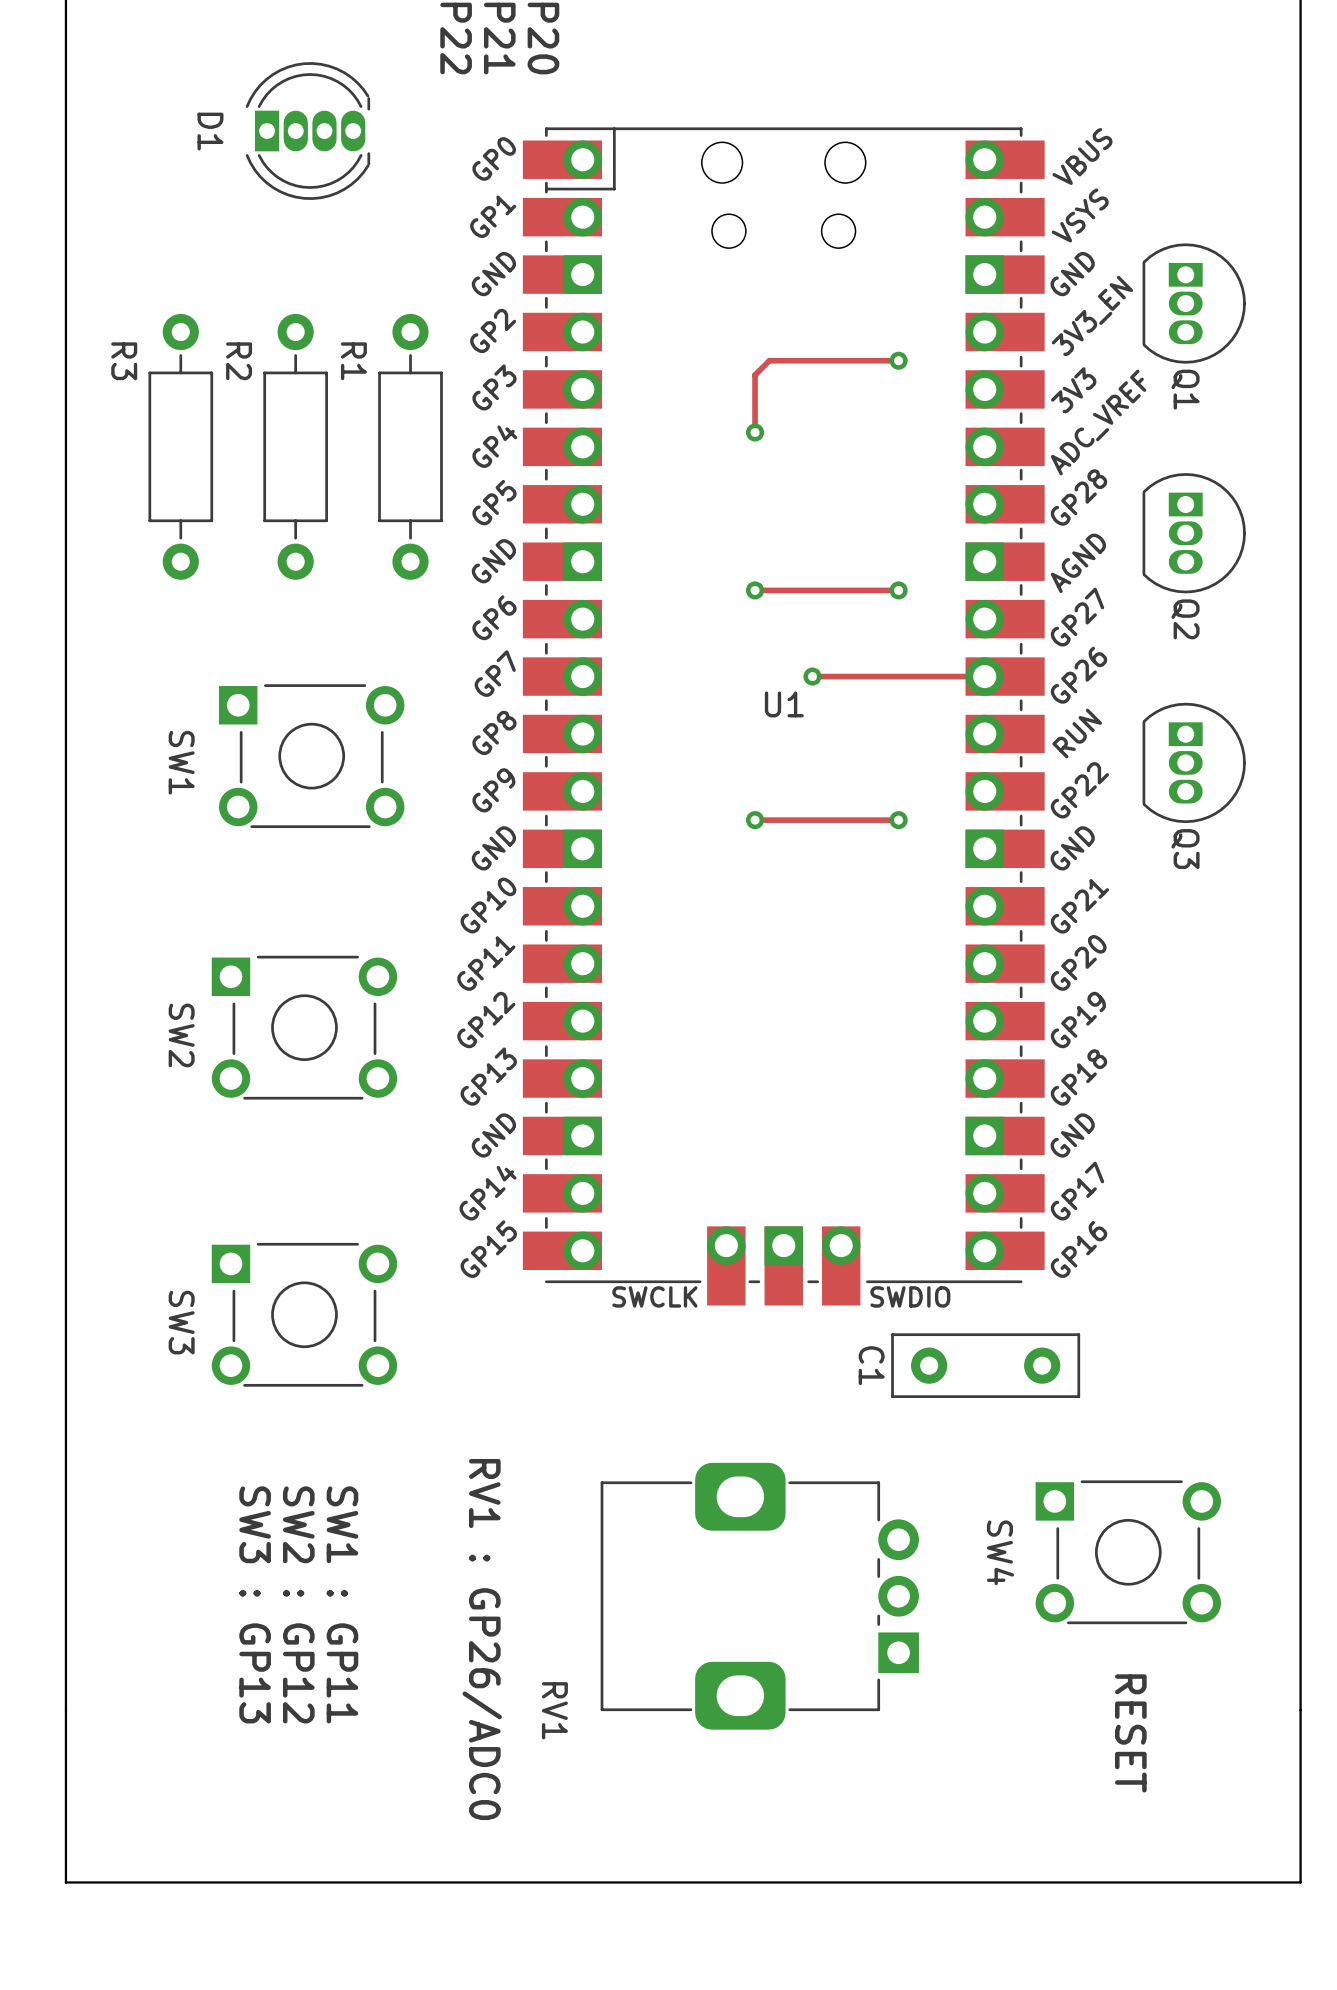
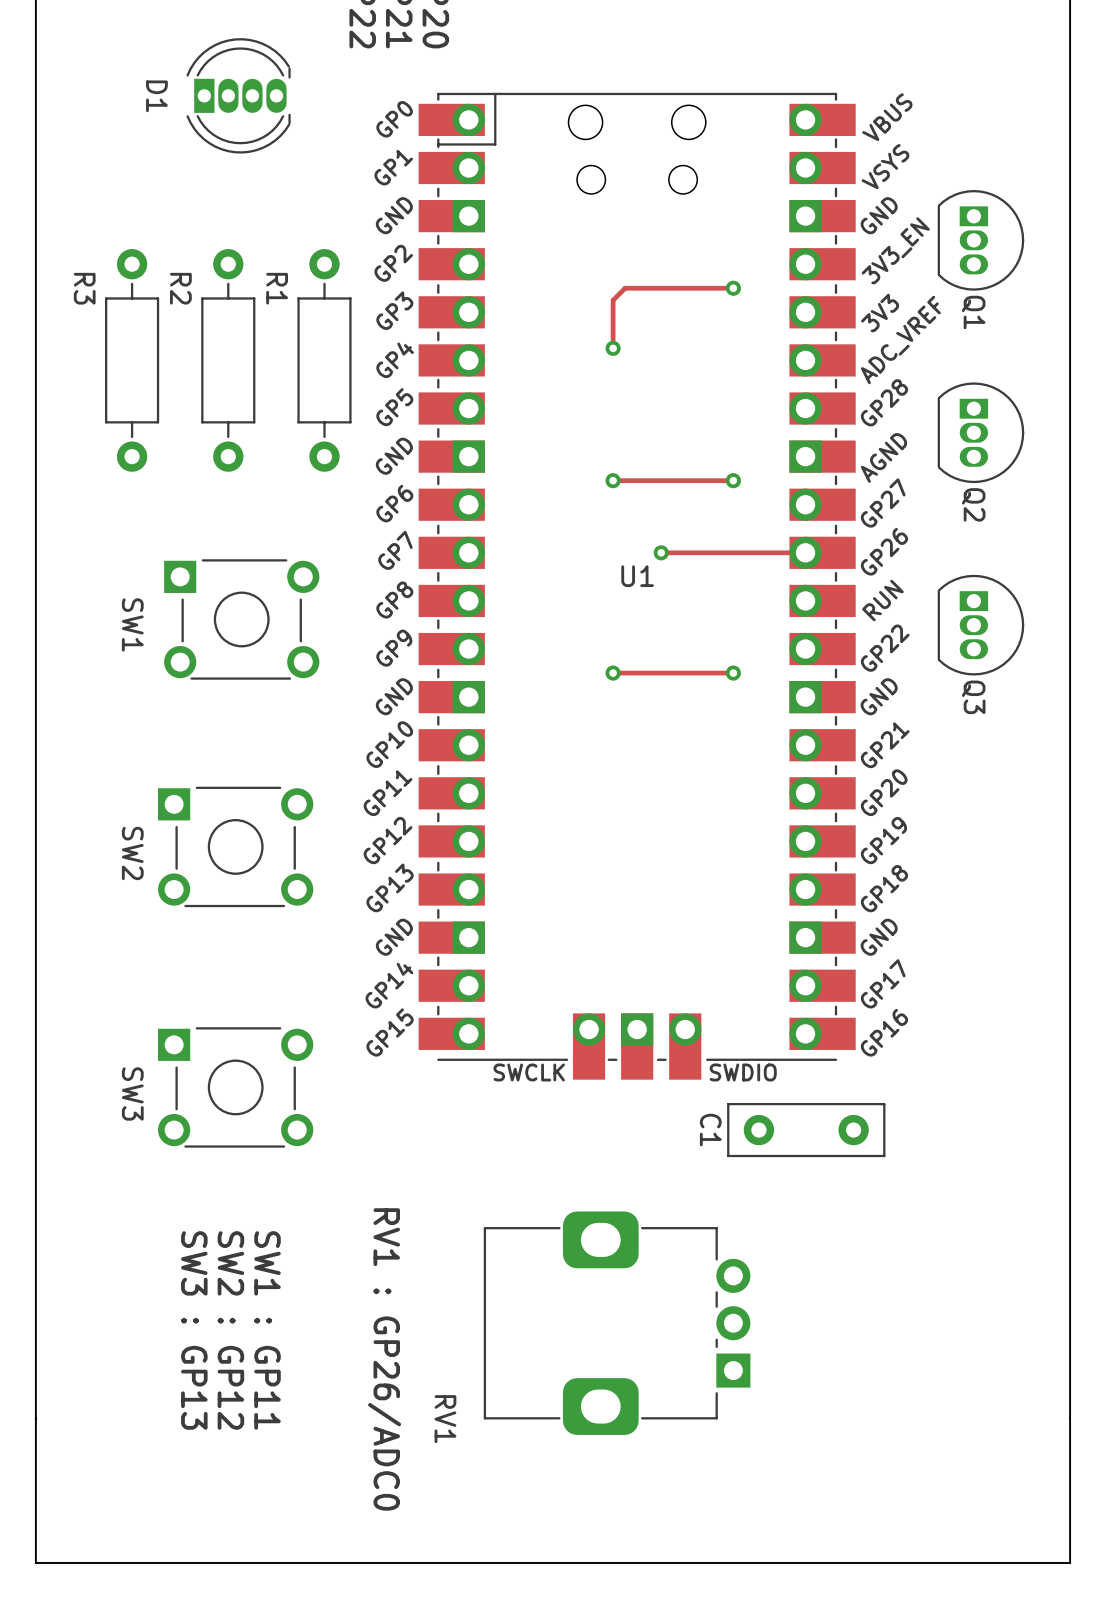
SW4: (1128, 1552) -> none
text: RESET (1130, 1733) -> none

